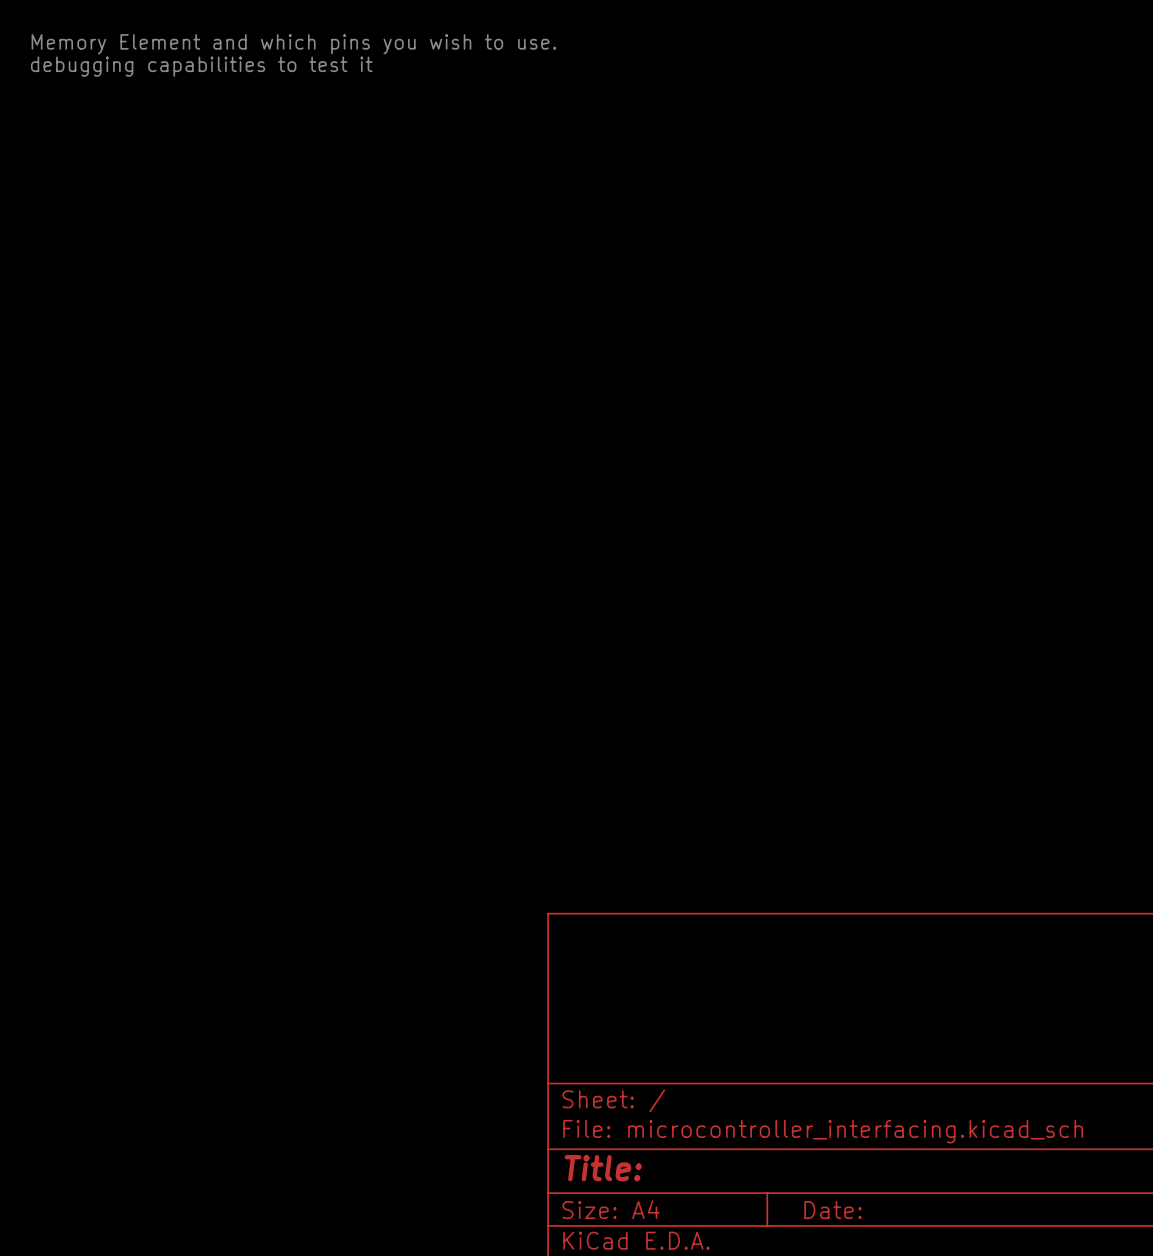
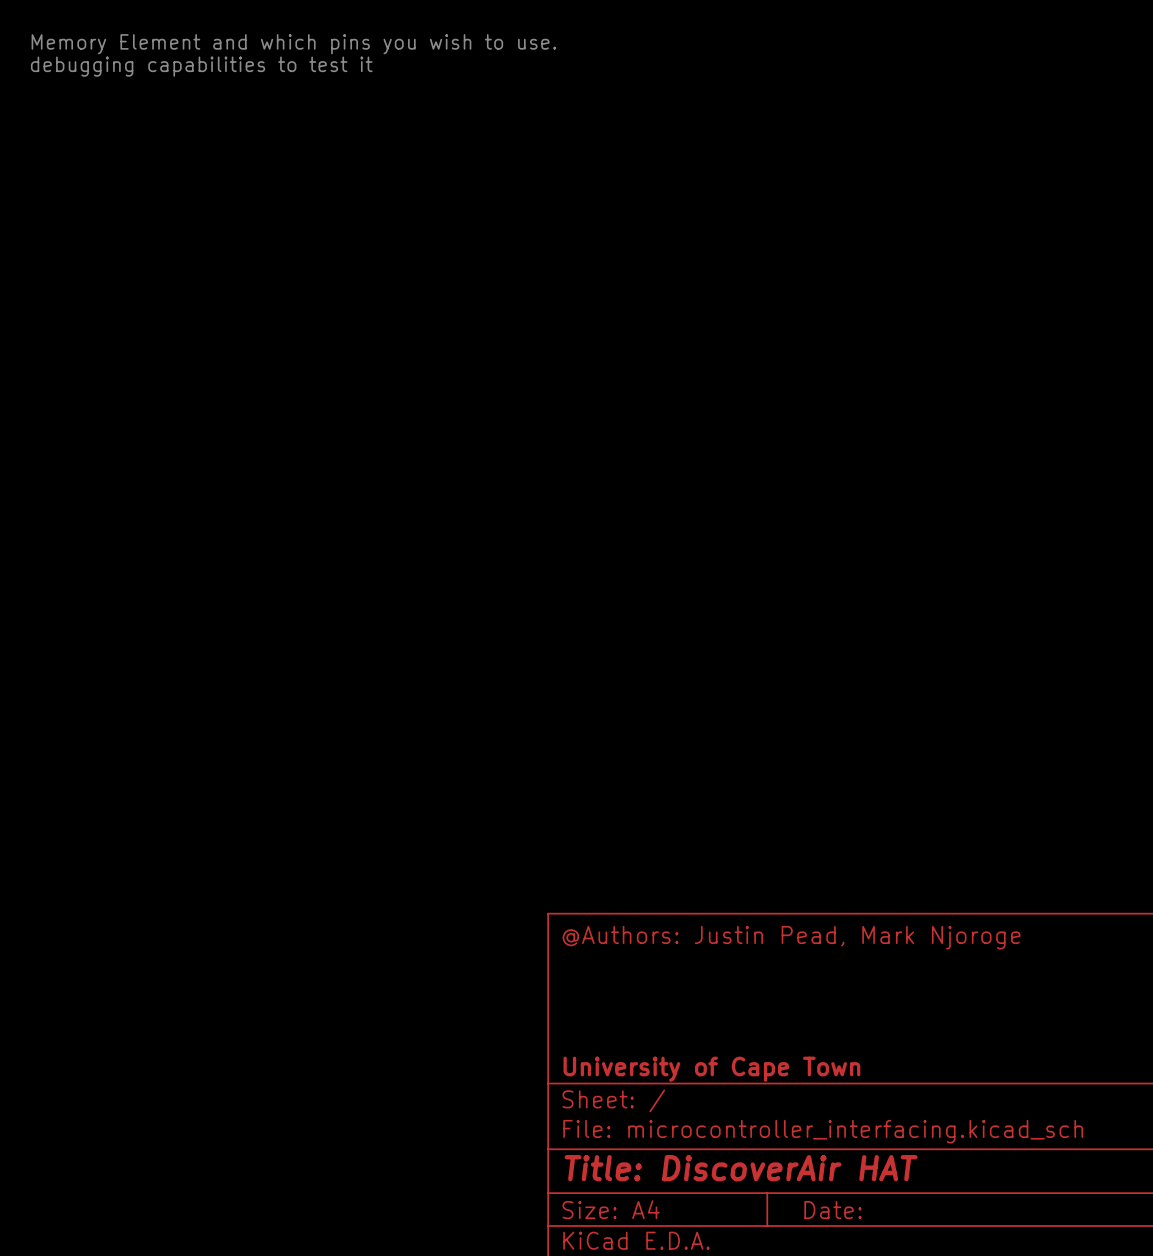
title block: none -> @Authors: Justin Pead, Mark Njoroge (791, 937)
title block: none -> University of Cape Town (711, 1069)
title block: Title: (603, 1168) -> Title: DiscoverAir HAT (741, 1168)

